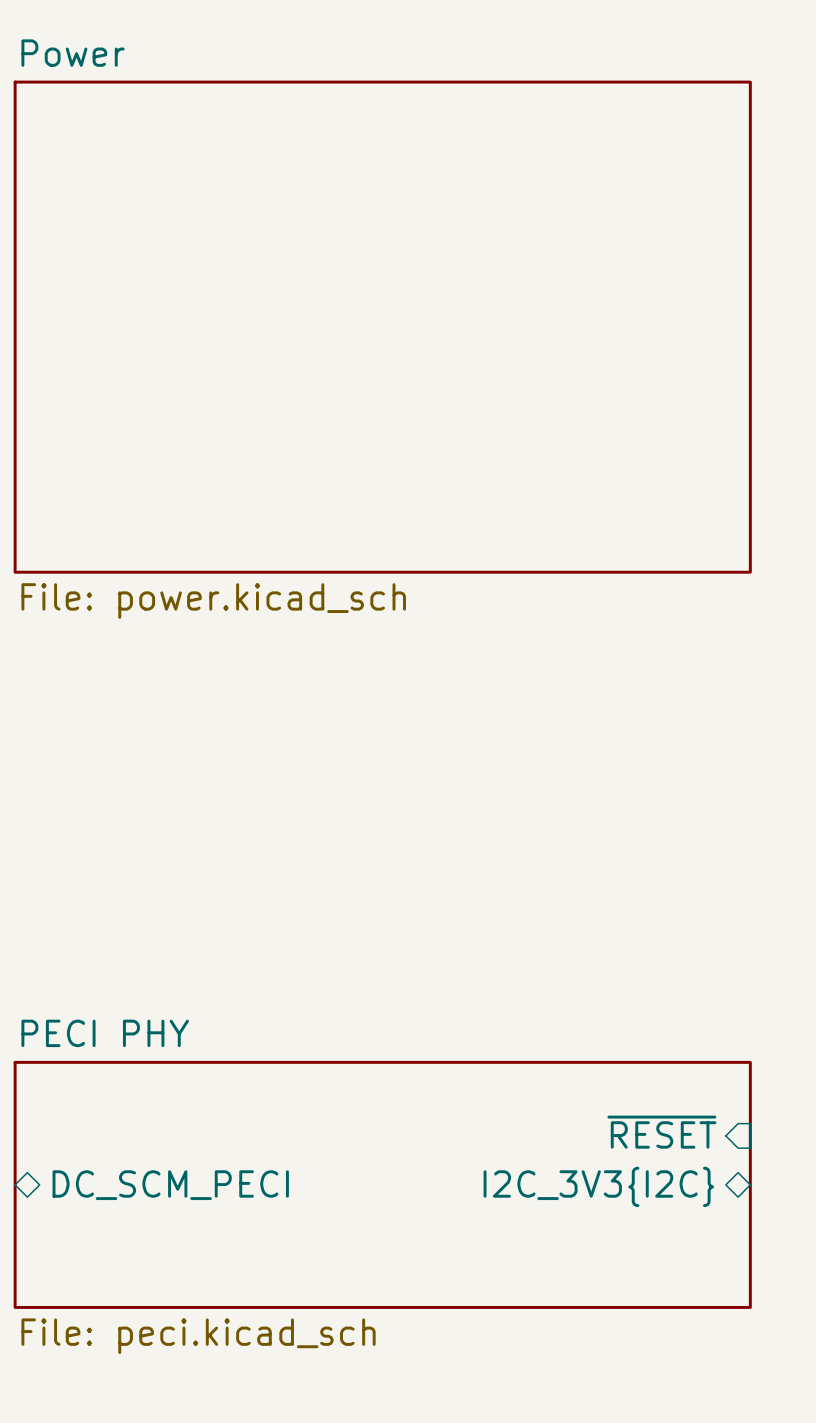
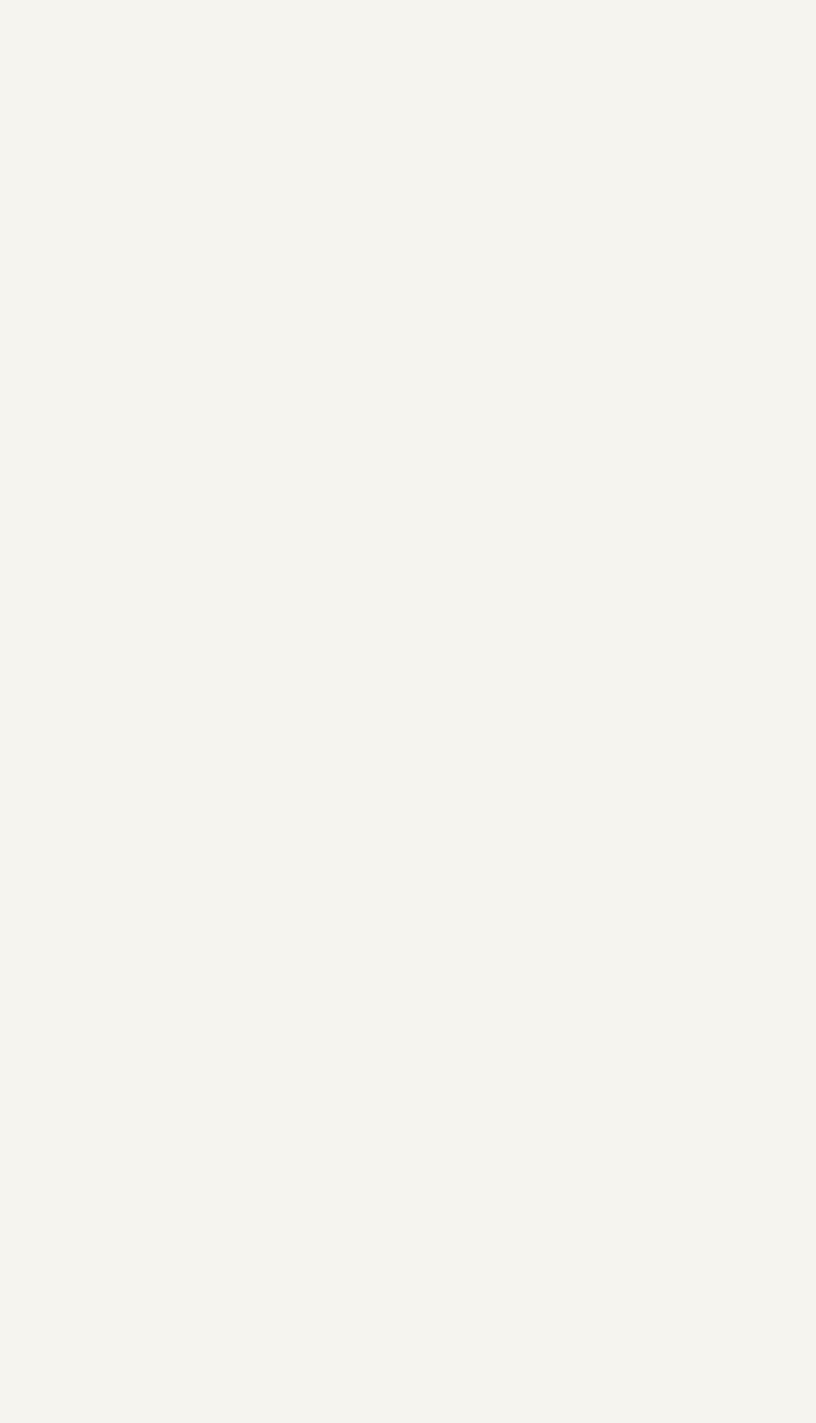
sheet Power: File: power.kicad_sch (382, 327) -> none
sheet pin: ~{RESET} (661, 1132) -> none
sheet PECI PHY: File: peci.kicad_sch (382, 1184) -> none
sheet pin: DC_SCM_PECI (170, 1185) -> none
sheet pin: I2C_3V3{I2C} (598, 1186) -> none

